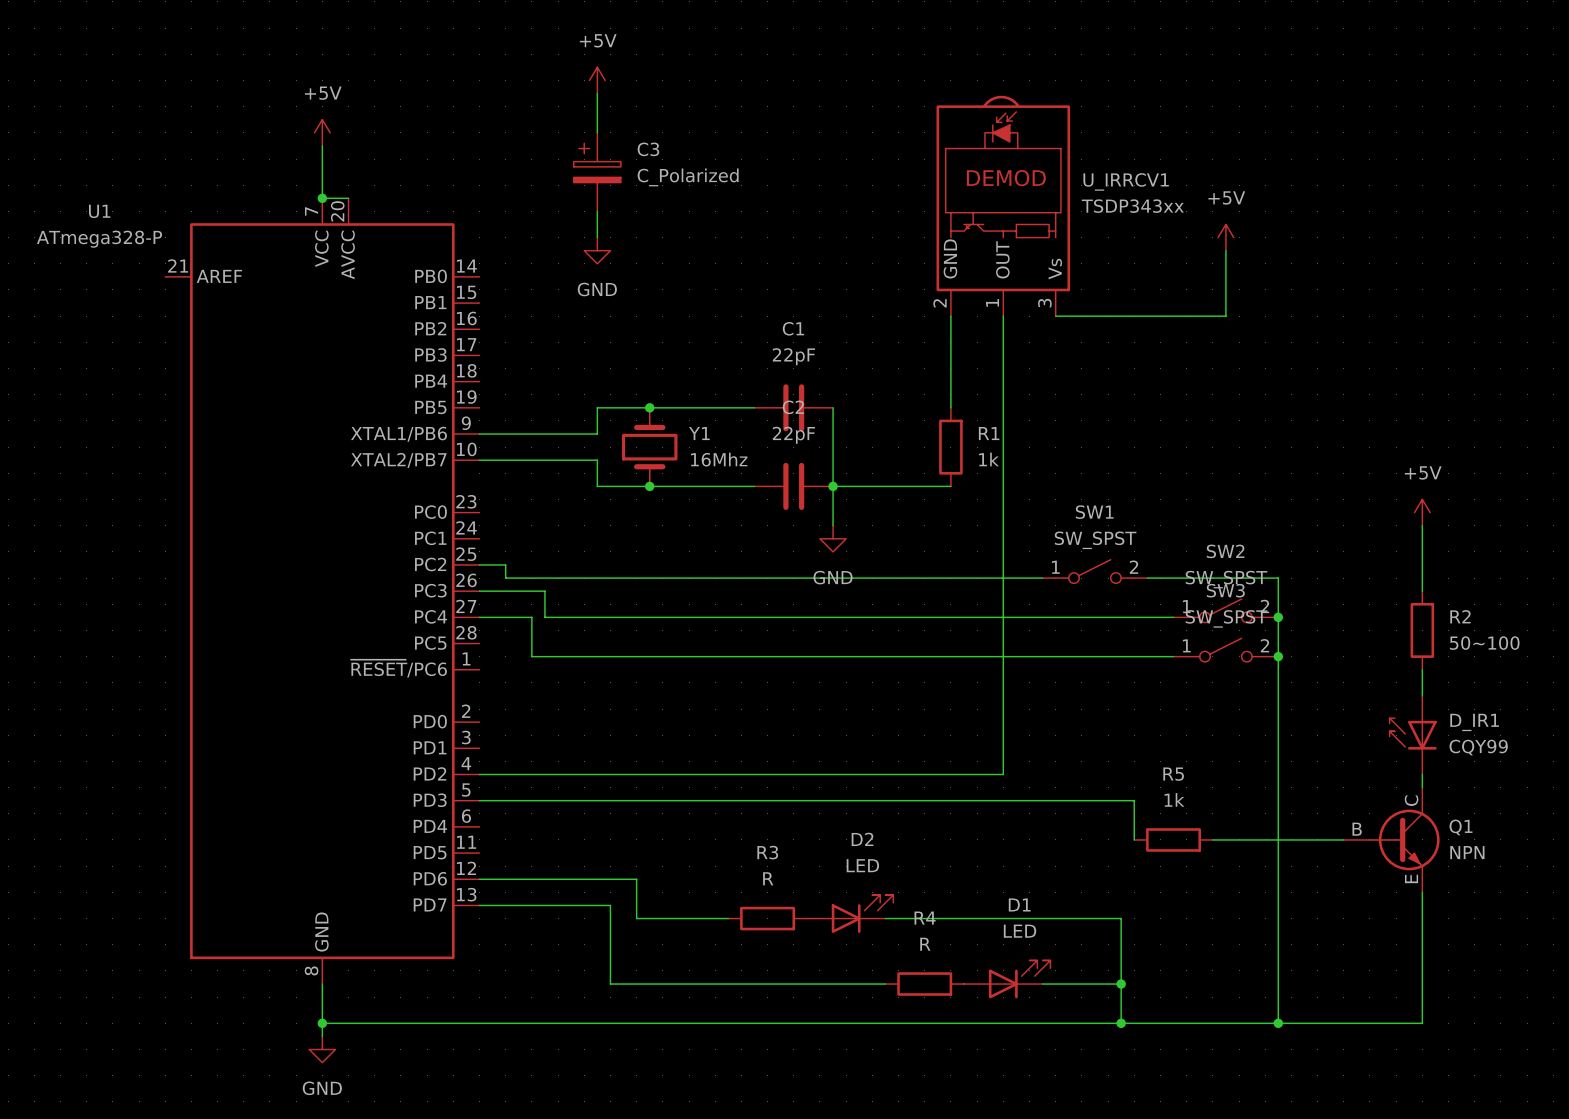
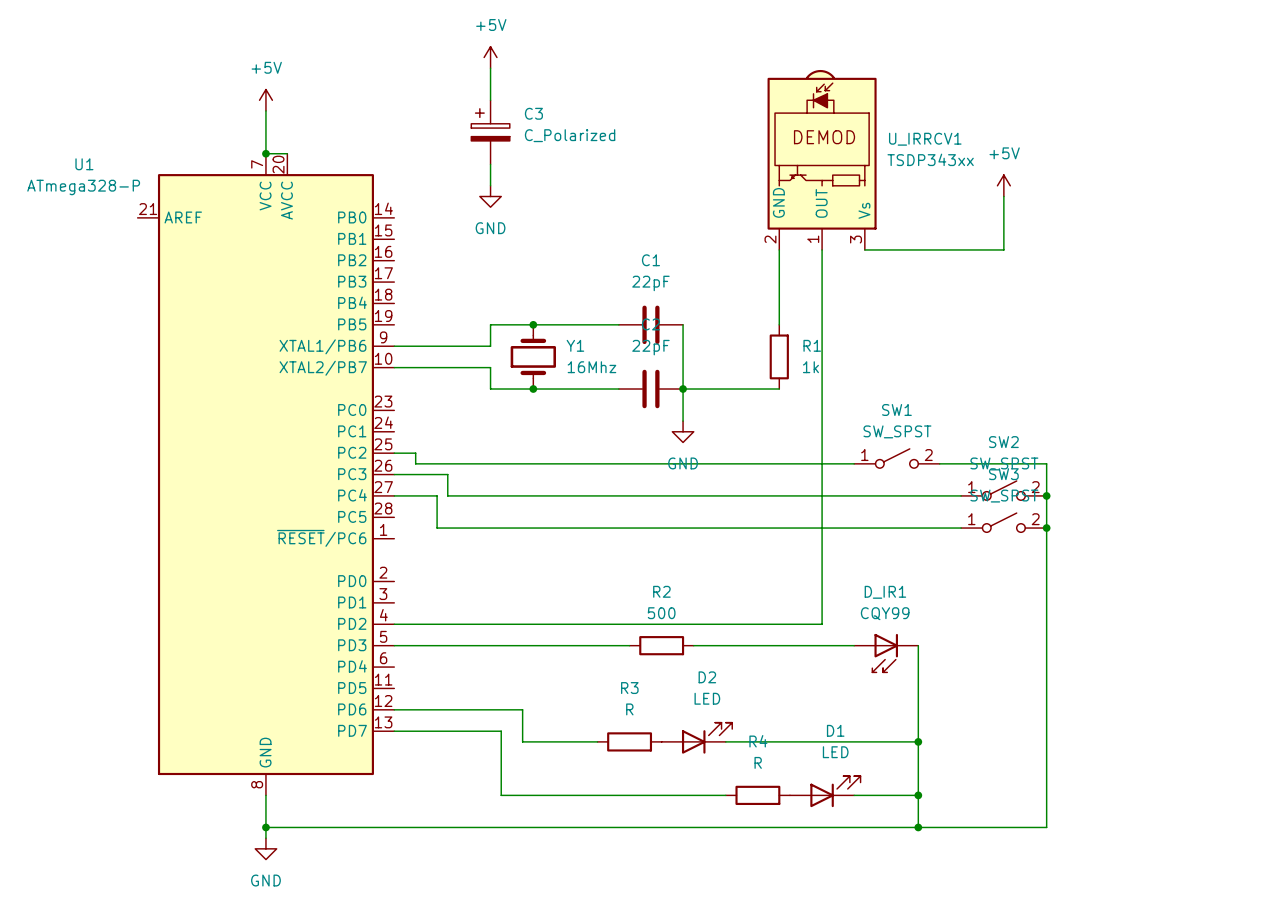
power symbol: +5V (1422, 512) -> none
wire: (1422, 525) (1422, 591) -> none
R2 name position: R2 (1460, 616) -> R2 (661, 591)
R2 rotation: 0° (1422, 630) -> 90° clockwise (661, 645)
R2 position: (1422, 630) -> (661, 645)
R2 value: 50~100 (1484, 643) -> 500 (661, 613)
wire: (1422, 669) (1422, 695) -> none
D_IR1 rotation: 0° (1413, 733) -> 90° counterclockwise (885, 653)
D_IR1 position: (1413, 735) -> (886, 653)
D_IR1 value position: CQY99 (1478, 747) -> CQY99 (885, 613)
wire: (1422, 774) (1422, 787) -> none
wire: (767, 800) (846, 800) -> none
wire: (1042, 800) (1134, 800) (1134, 839) -> none
wire: none -> (918, 645) (918, 741)
R5: 1k (1173, 839) -> none
wire: (1212, 839) (1343, 839) -> none
Q1: NPN (1391, 839) -> none
wire: (1422, 892) (1422, 1023) (1278, 1023) -> none
junction: none -> (918, 741)
junction: (1278, 1023) -> none

